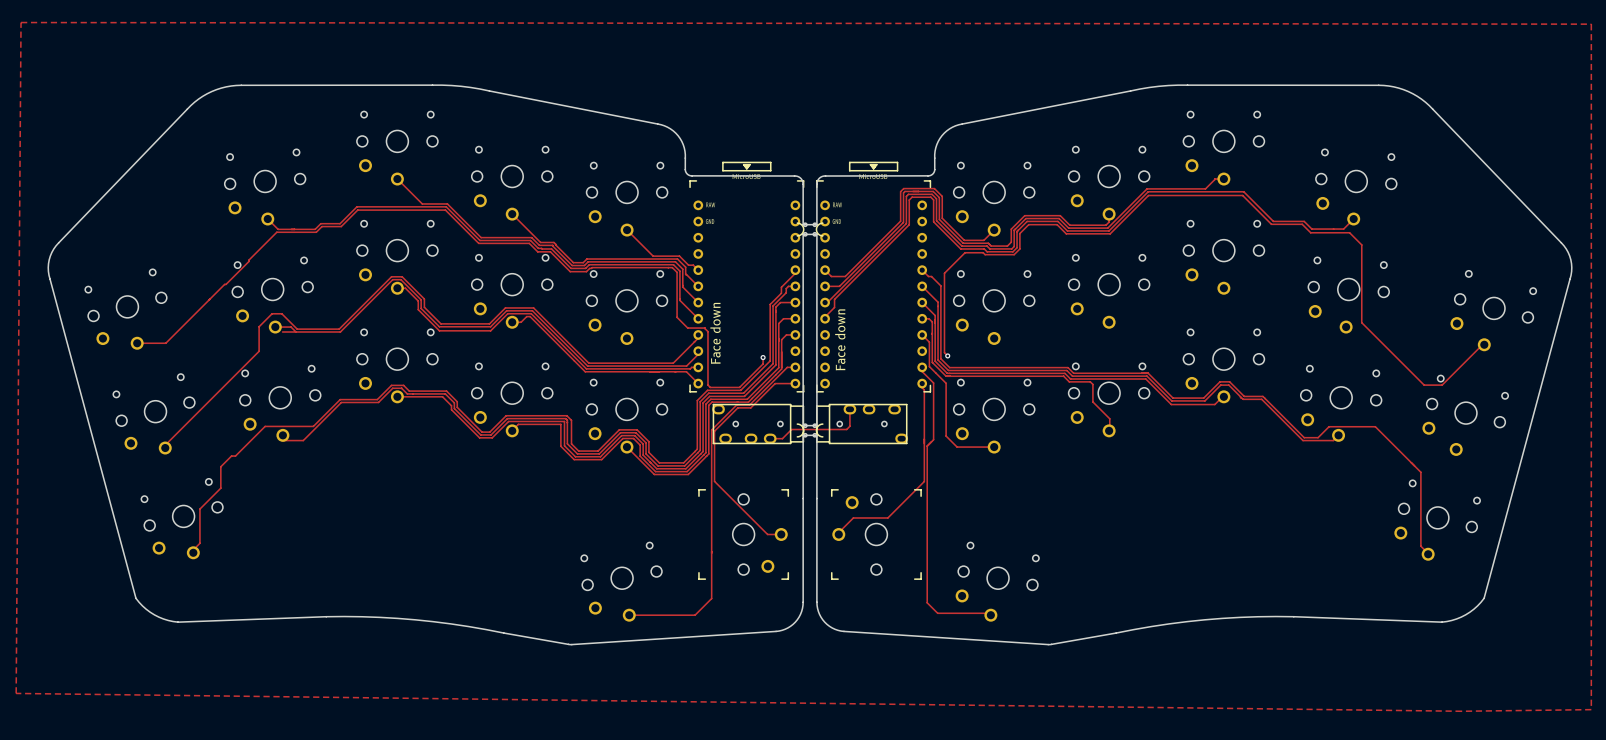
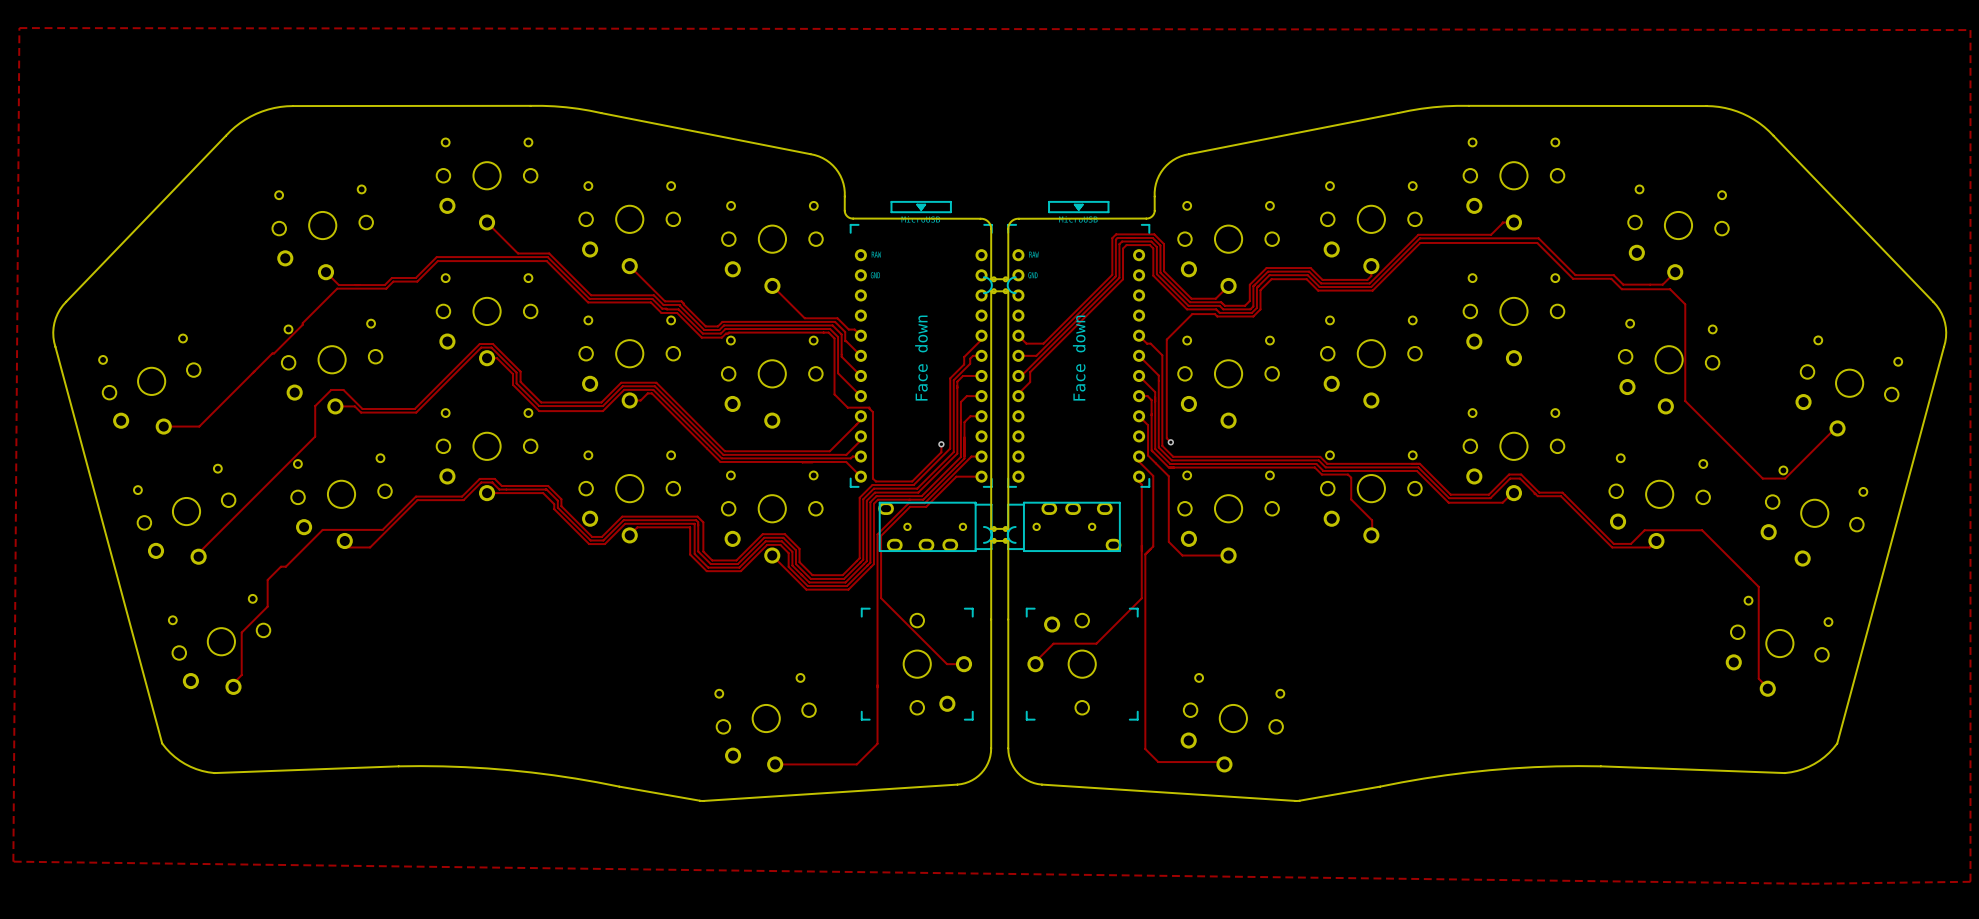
text: none -> Face down (921, 358)
text: none -> Face down (1079, 358)
track: (282, 332) (296, 332) -> none
text: Face down (715, 333) -> none
text: Face down (840, 339) -> none
track: (849, 409) (849, 426) (846, 429) (791, 429) (782, 438) (770, 438) -> none

